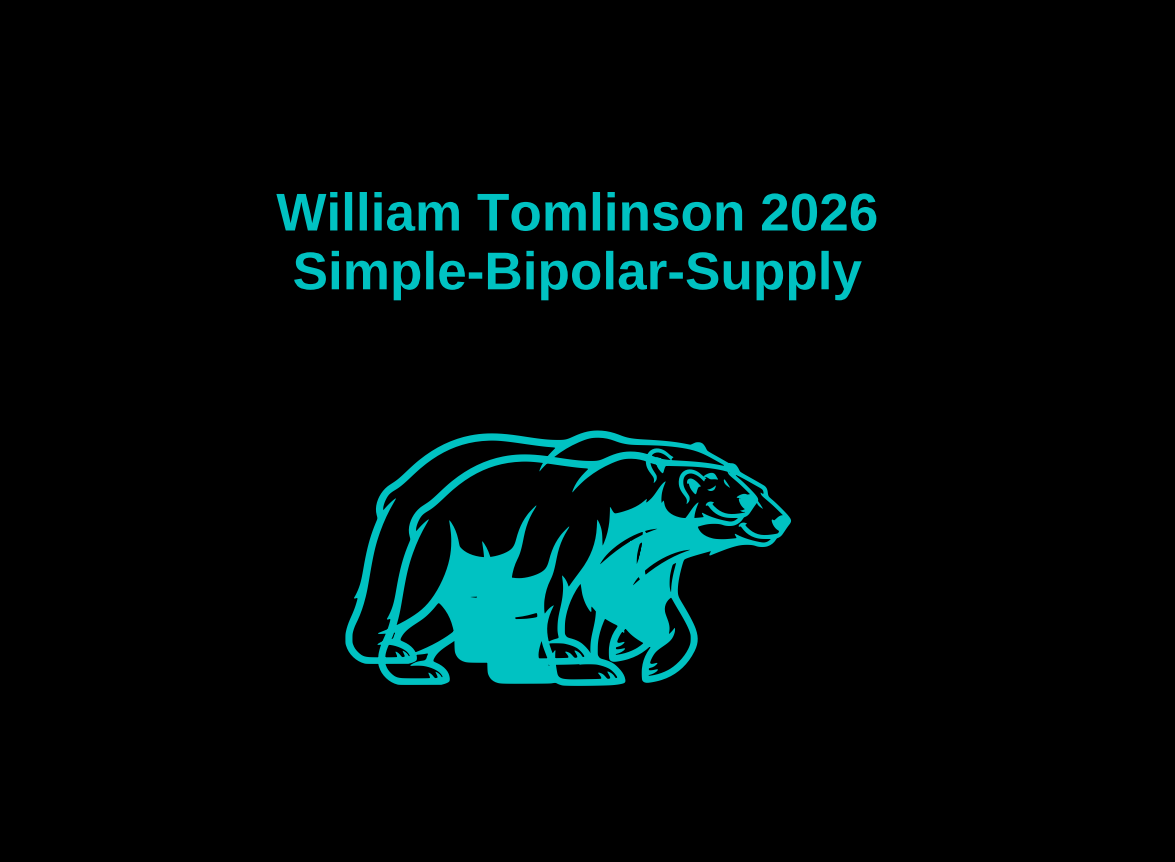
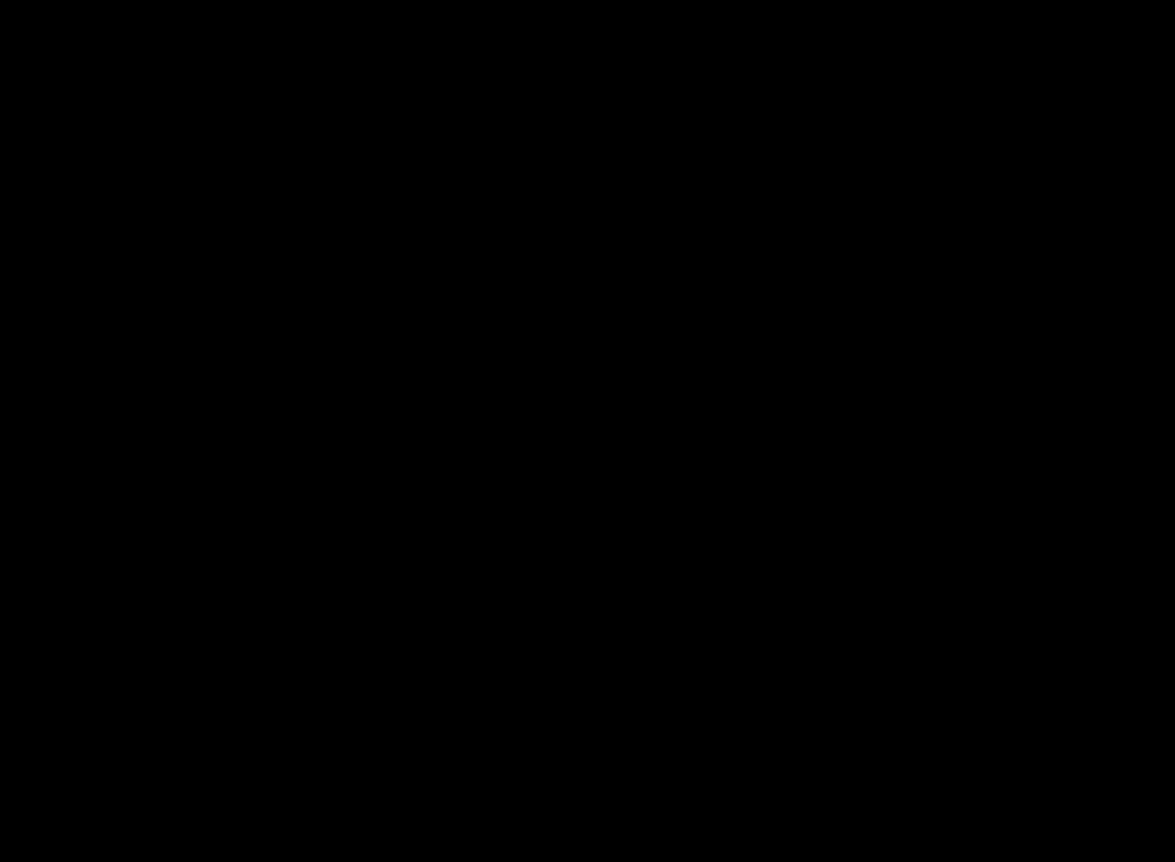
text: William Tomlinson 2026 (576, 211) -> none
text: Simple-Bipolar-Supply (577, 275) -> none
drawing: [345, 430, 792, 686] -> none

